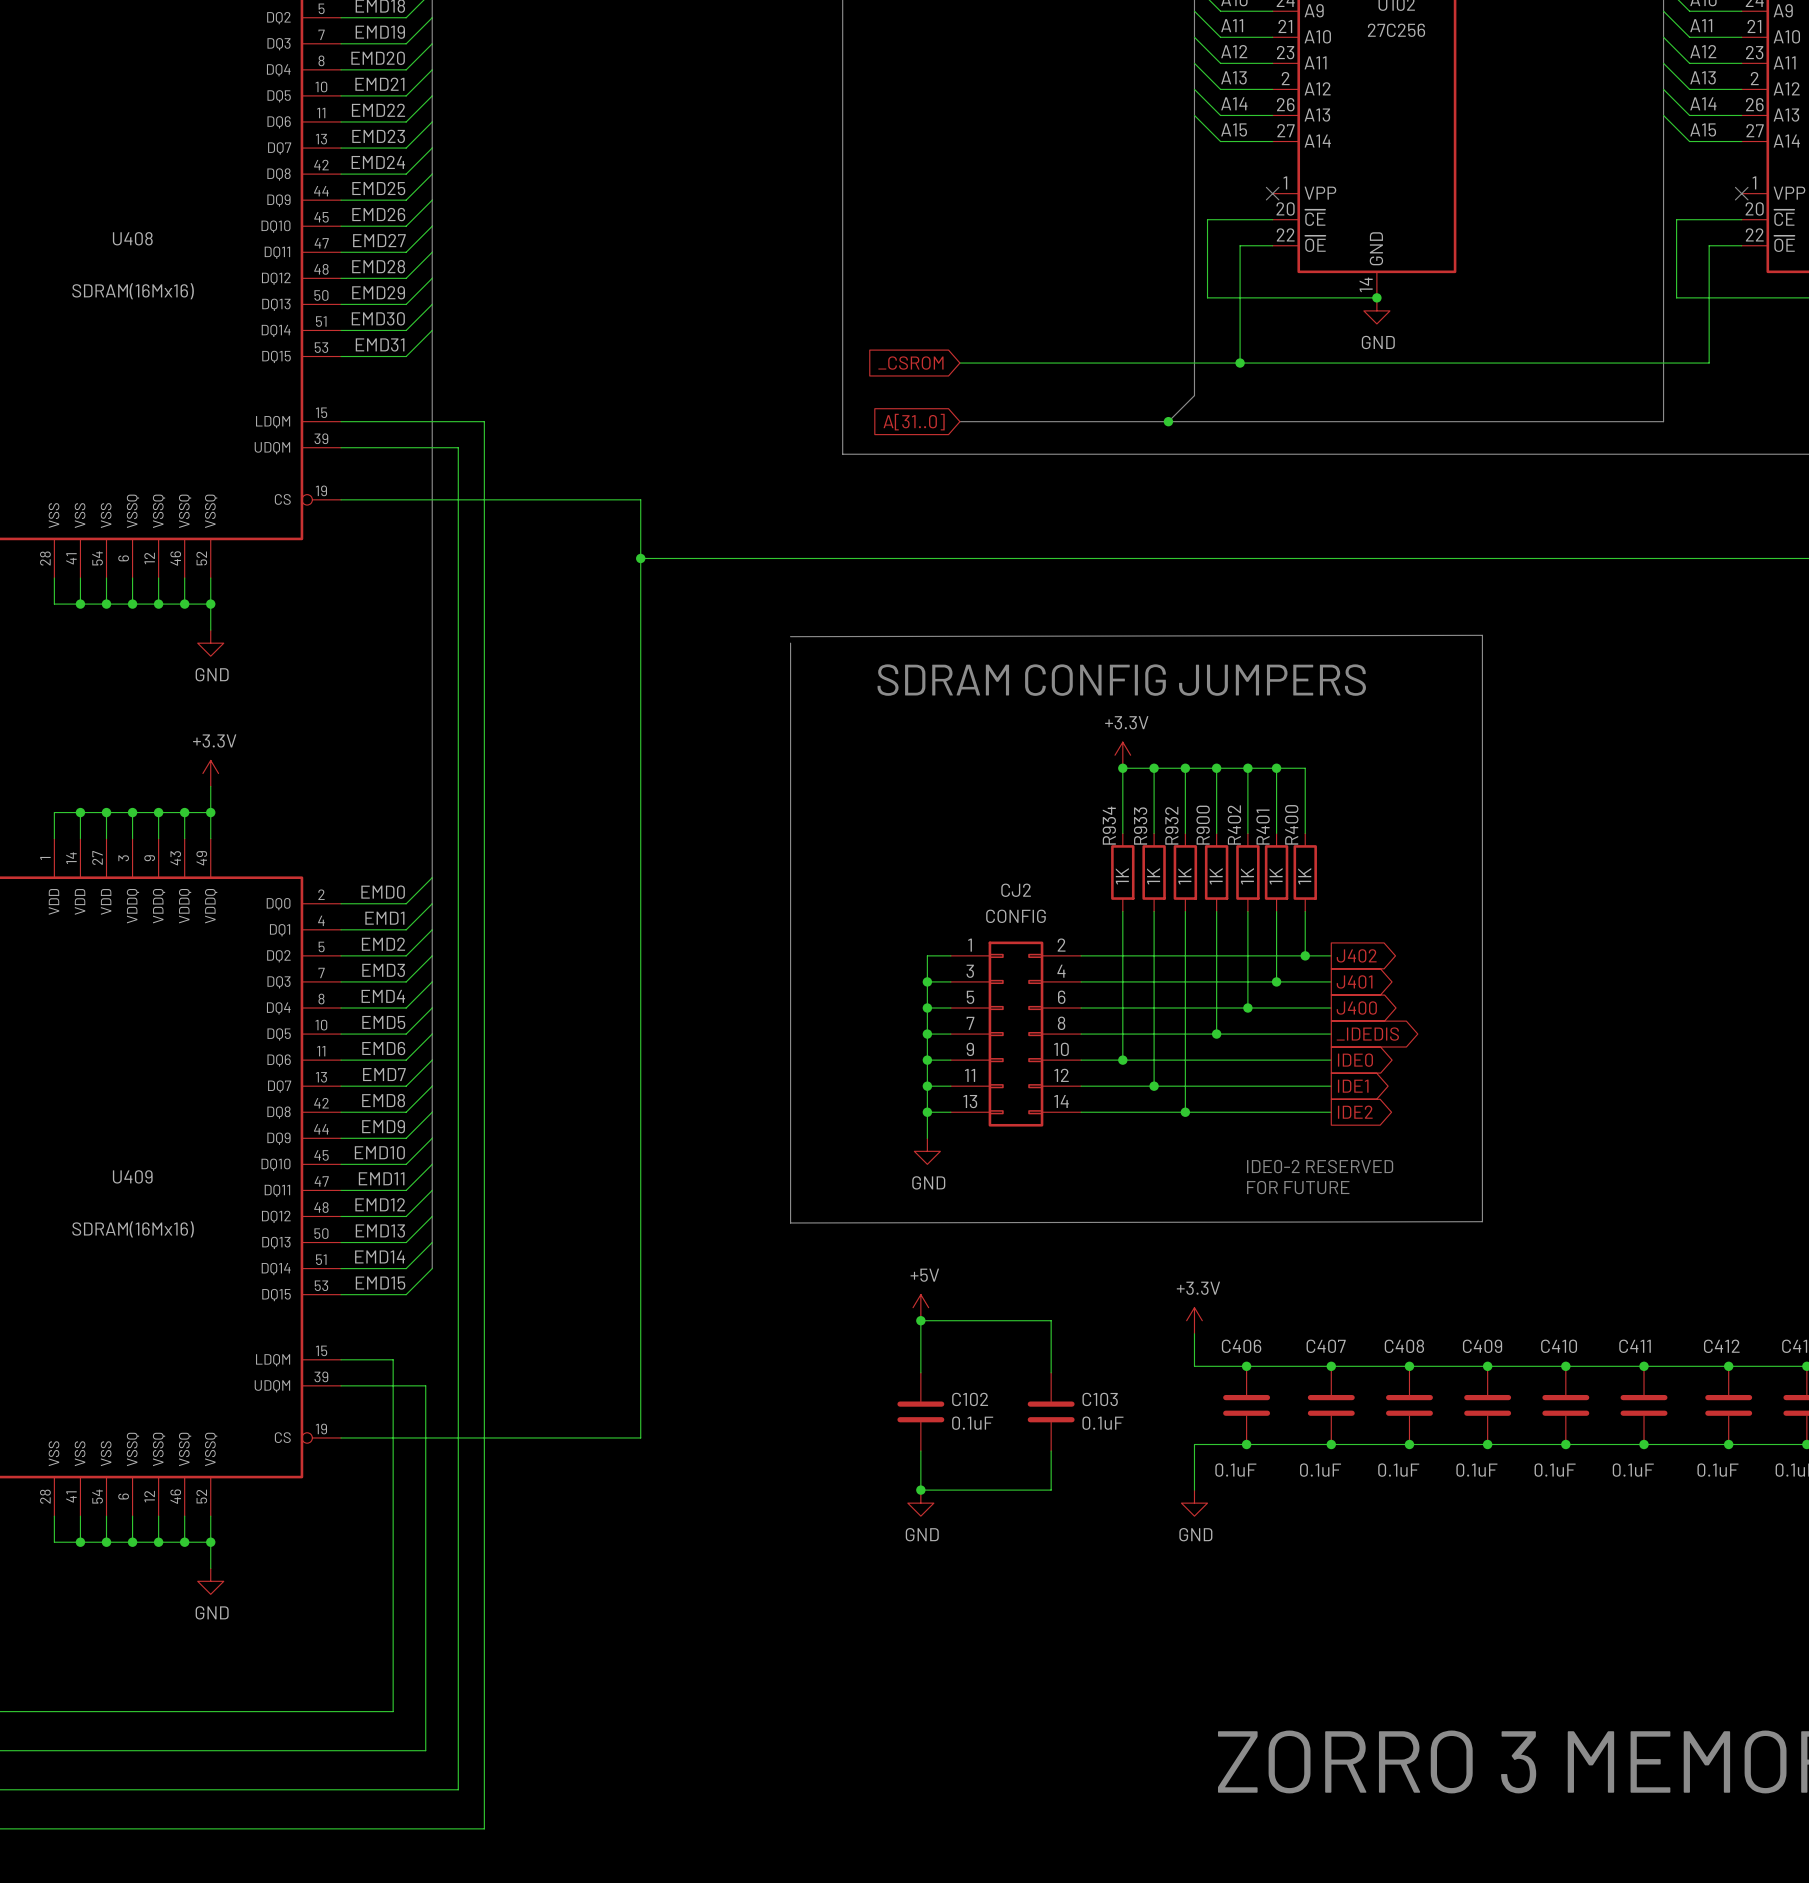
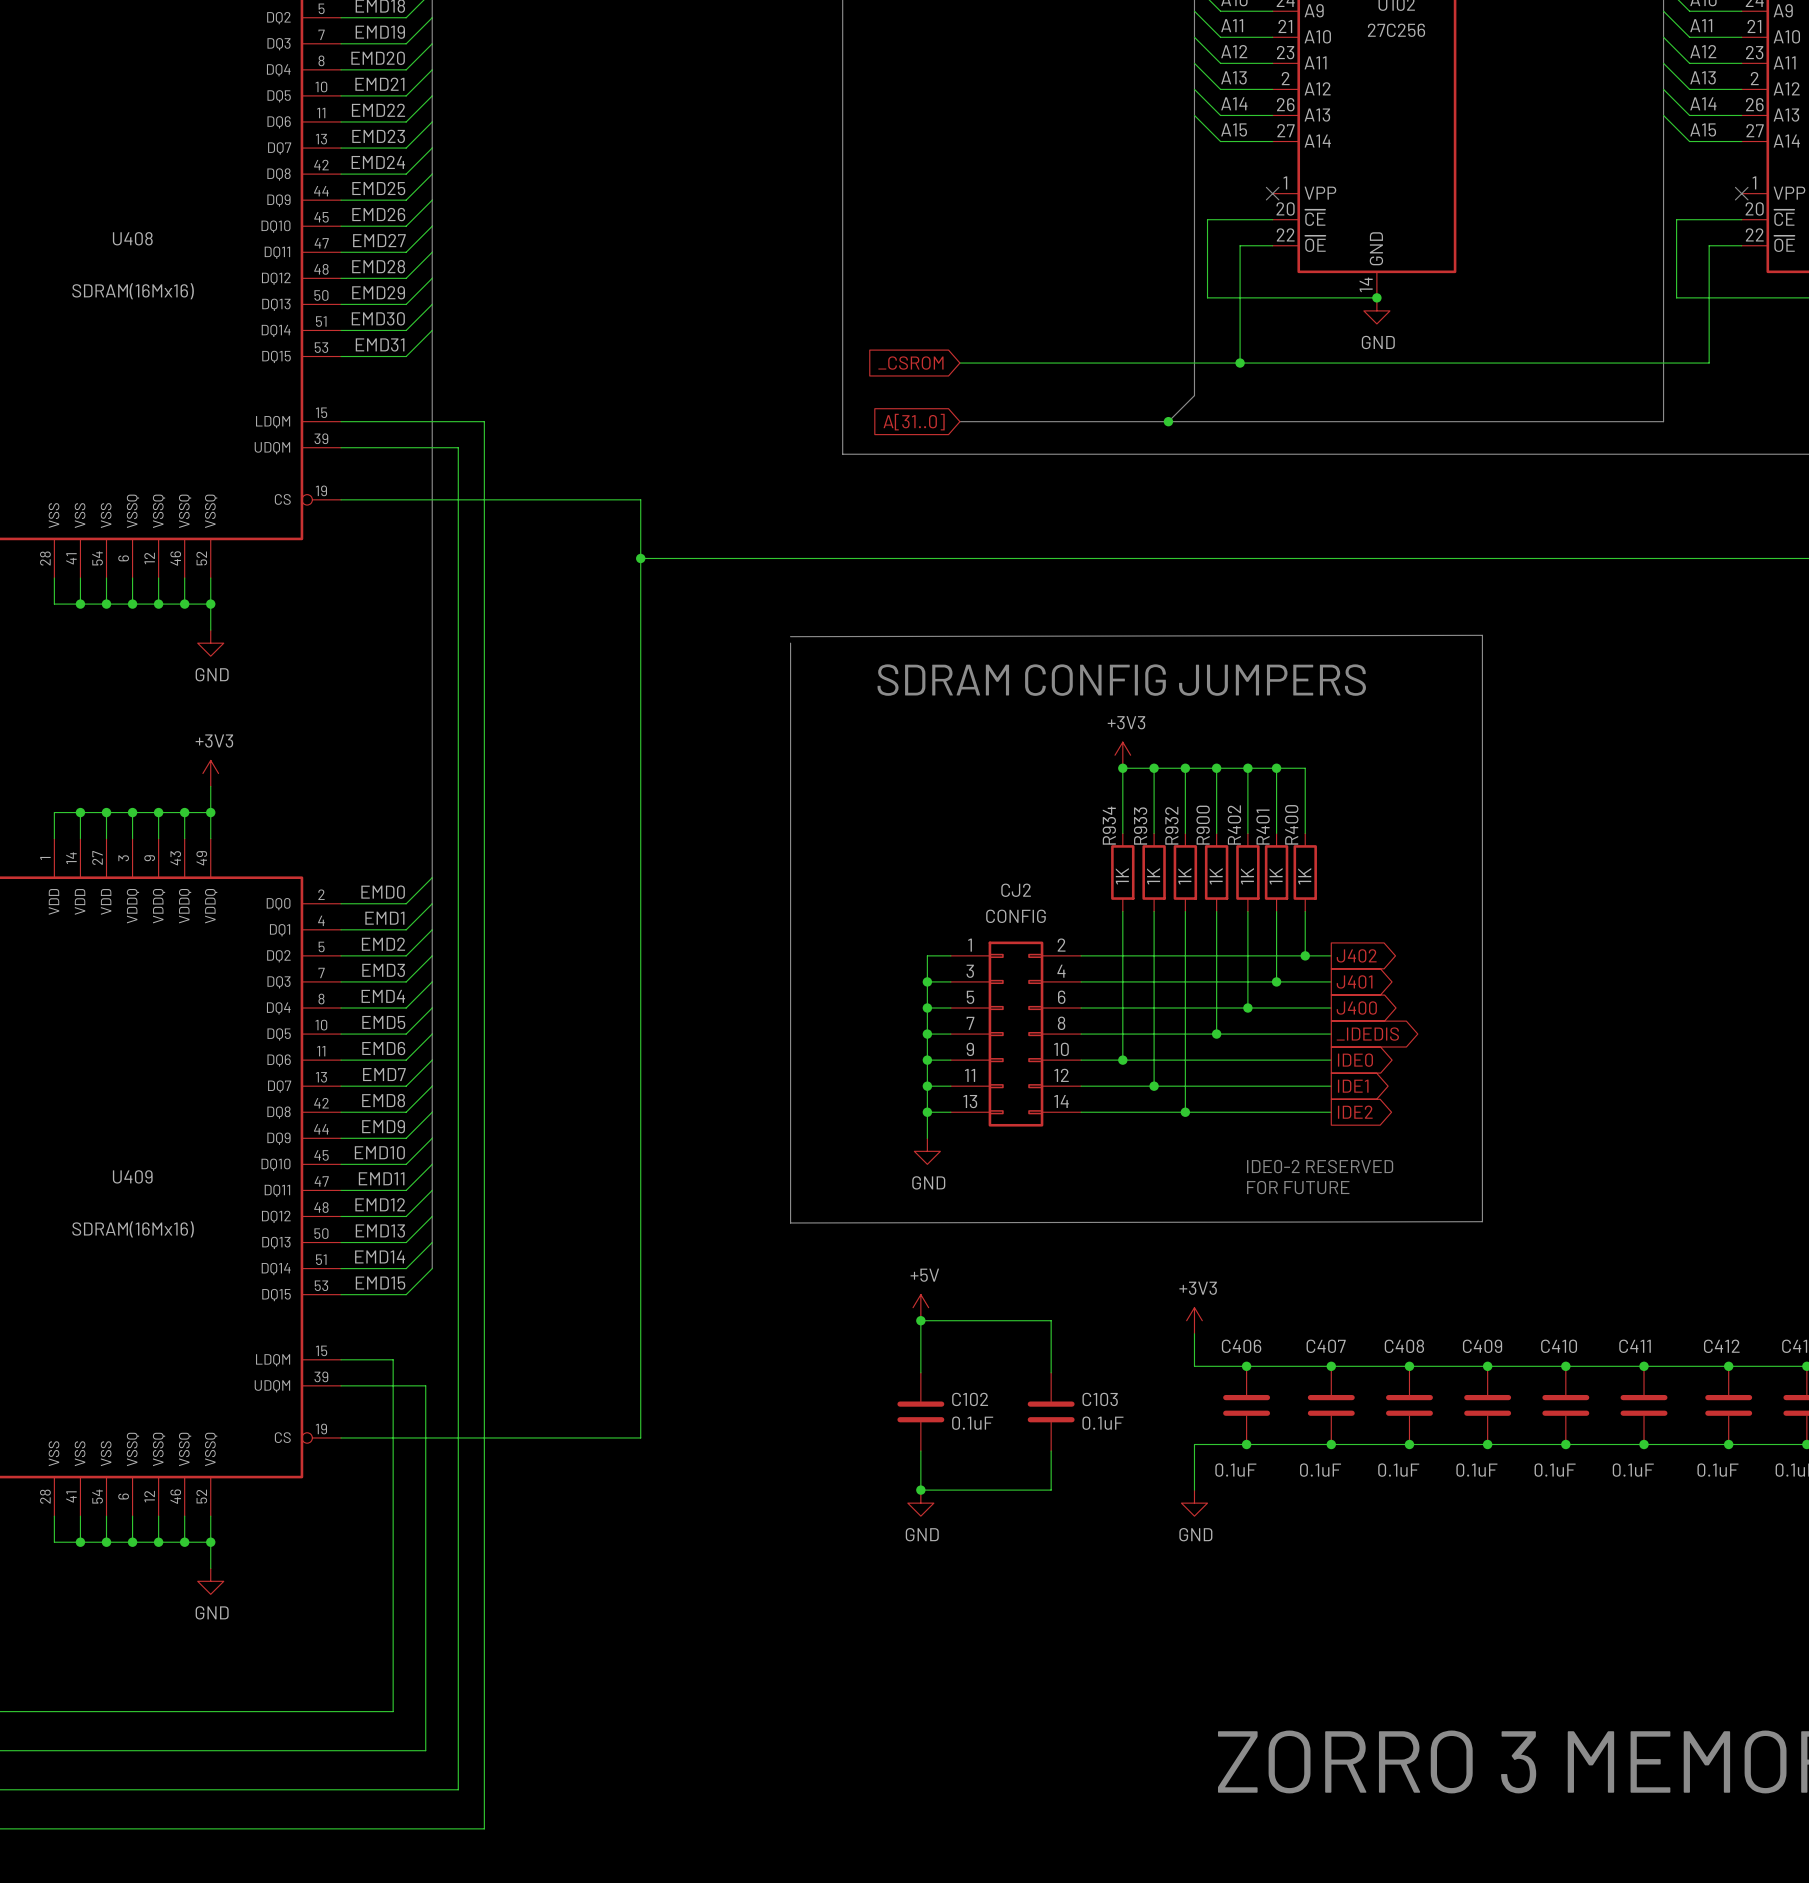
power symbol: +3.3V (1122, 755) -> +3V3 (1122, 755)
power symbol: +3.3V (210, 773) -> +3V3 (210, 773)
power symbol: +3.3V (1194, 1320) -> +3V3 (1194, 1320)

